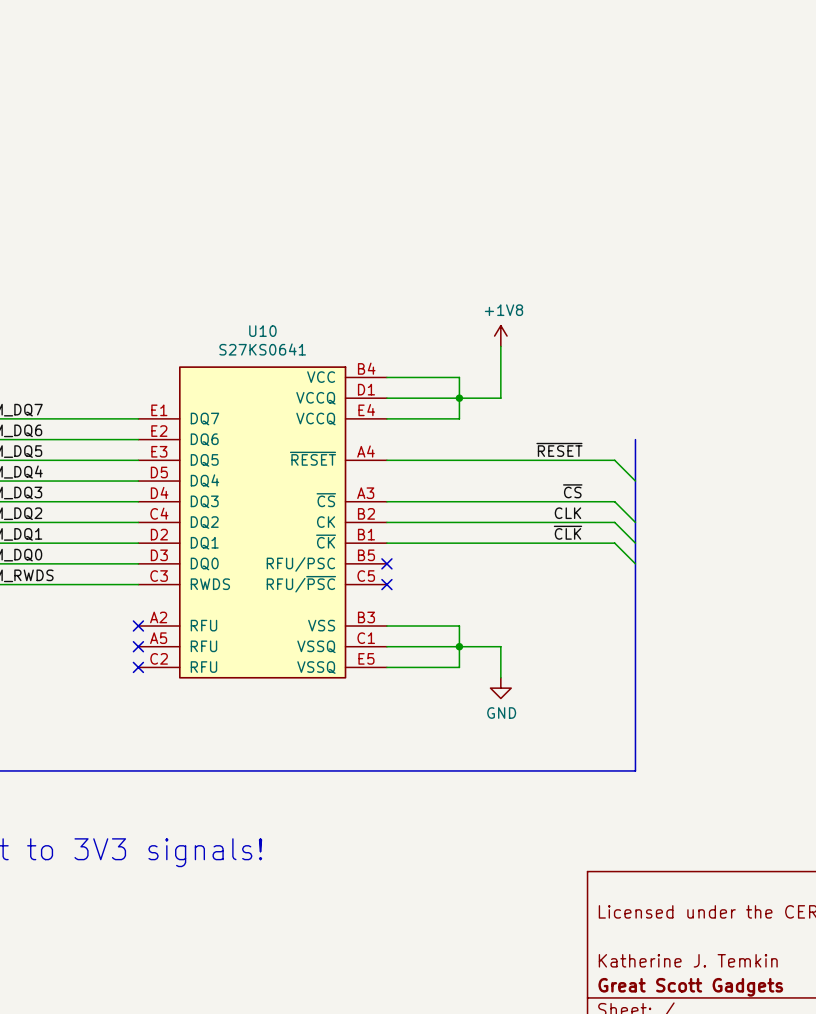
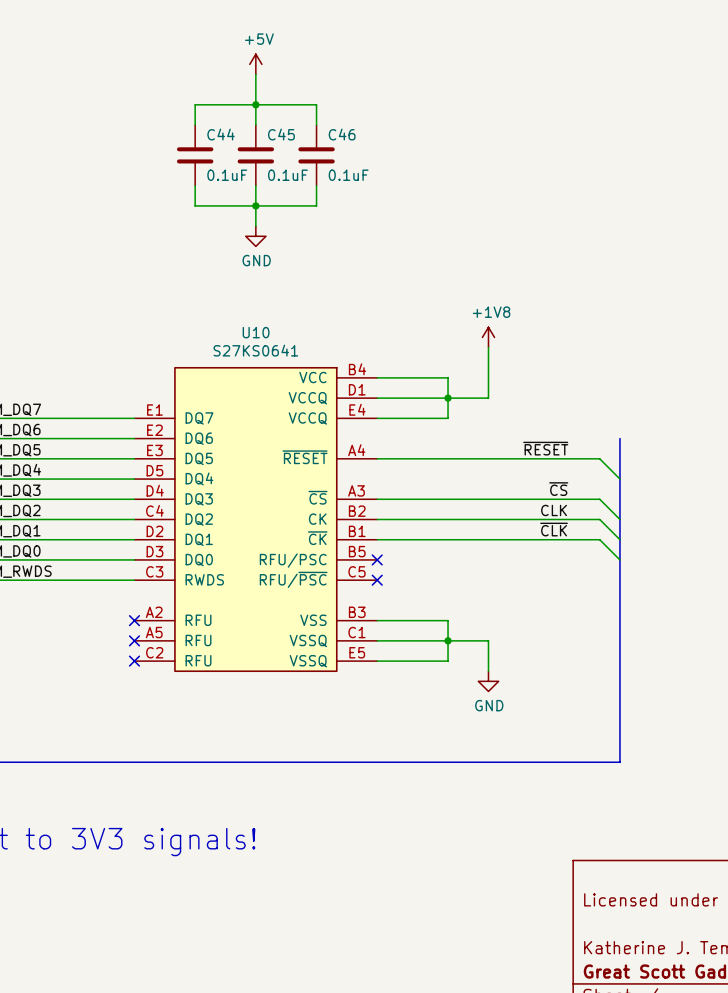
power symbol: none -> +5V (255, 64)
wire: none -> (255, 74) (255, 125)
junction: none -> (255, 104)
wire: none -> (195, 125) (195, 104) (316, 104) (316, 125)
C44: none -> 0.1uF (195, 155)
C45: none -> 0.1uF (255, 155)
C46: none -> 0.1uF (316, 155)
wire: none -> (195, 185) (195, 205) (316, 205) (316, 185)
wire: none -> (255, 185) (255, 226)
junction: none -> (255, 205)
power symbol: none -> GND (255, 236)

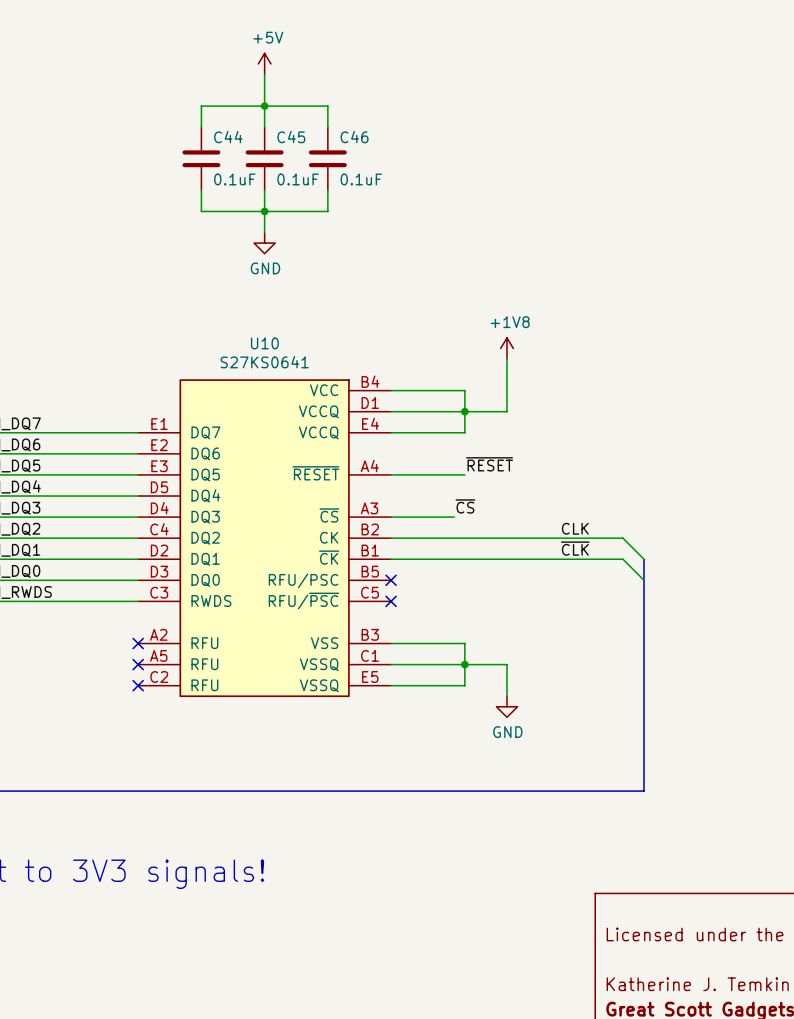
bus: (619, 438) (619, 539) -> none
label position: ~{RESET} (545, 448) -> ~{RESET} (489, 464)
wire: (448, 458) (599, 458) (619, 479) -> none
label position: ~{CS} (558, 489) -> ~{CS} (465, 506)
wire: (437, 499) (599, 499) (619, 519) -> none

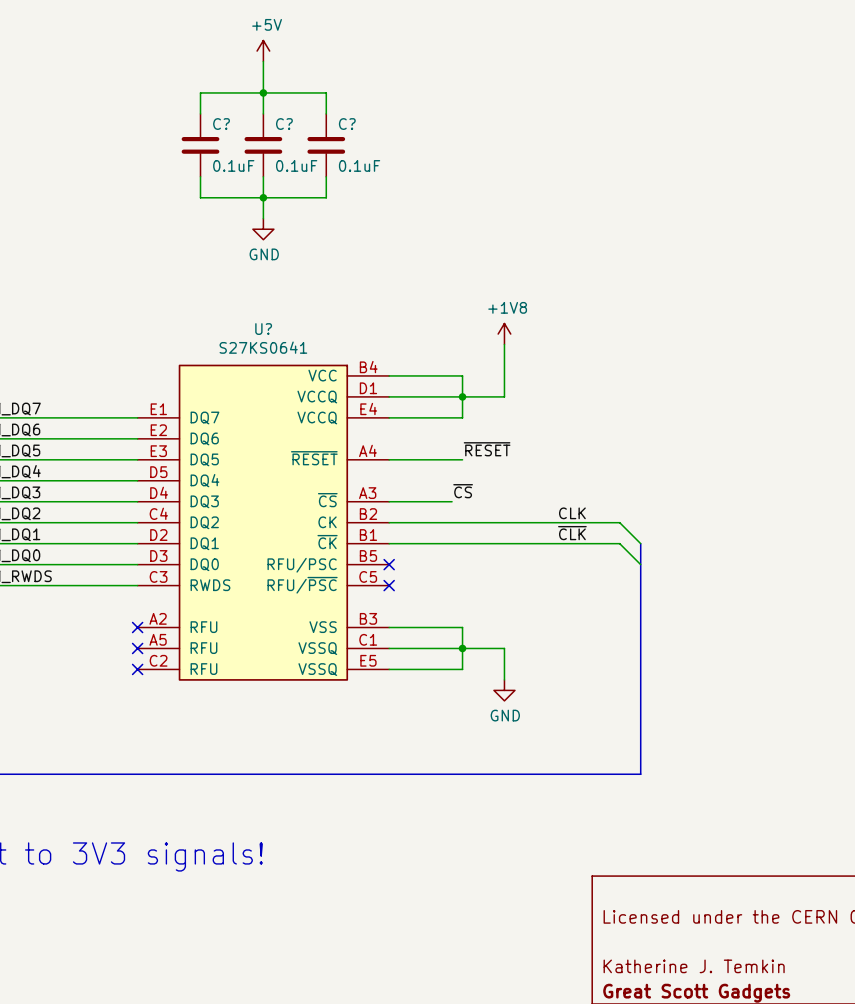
C44 name: C44 (228, 137) -> C? (221, 124)
C45 name: C45 (291, 137) -> C? (284, 124)
C46 name: C46 (354, 137) -> C? (347, 124)
U10 name: U10 (264, 343) -> U? (263, 329)

